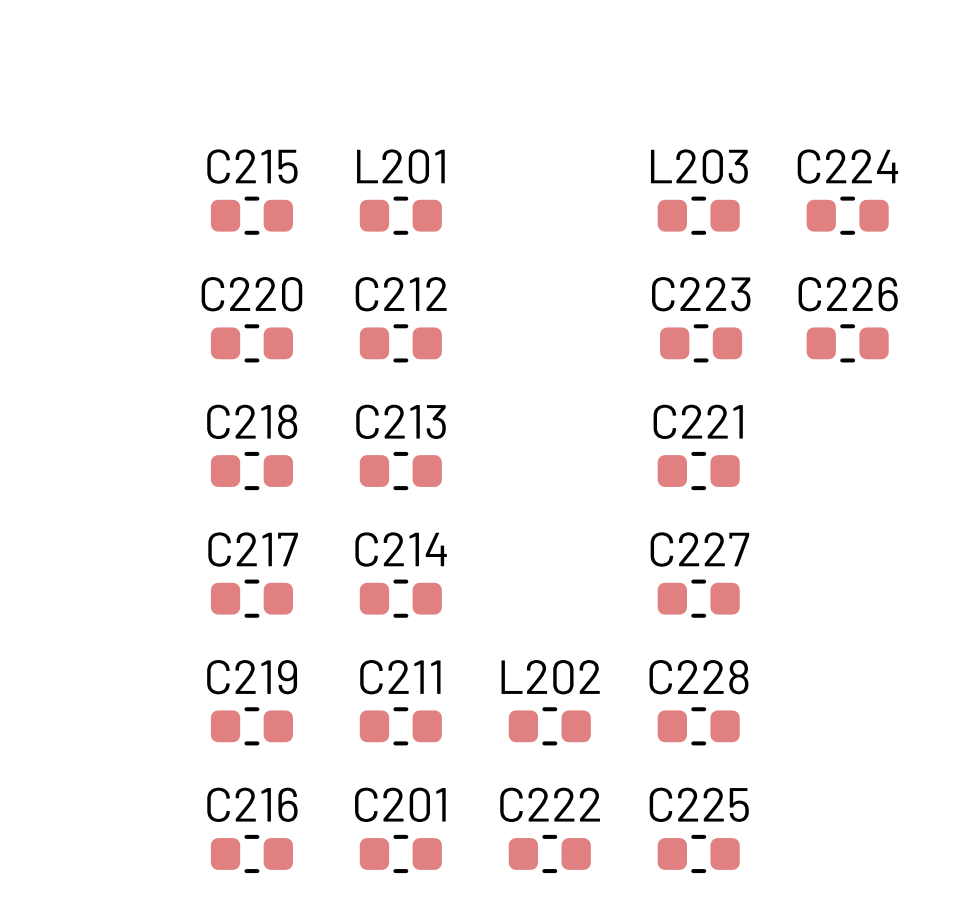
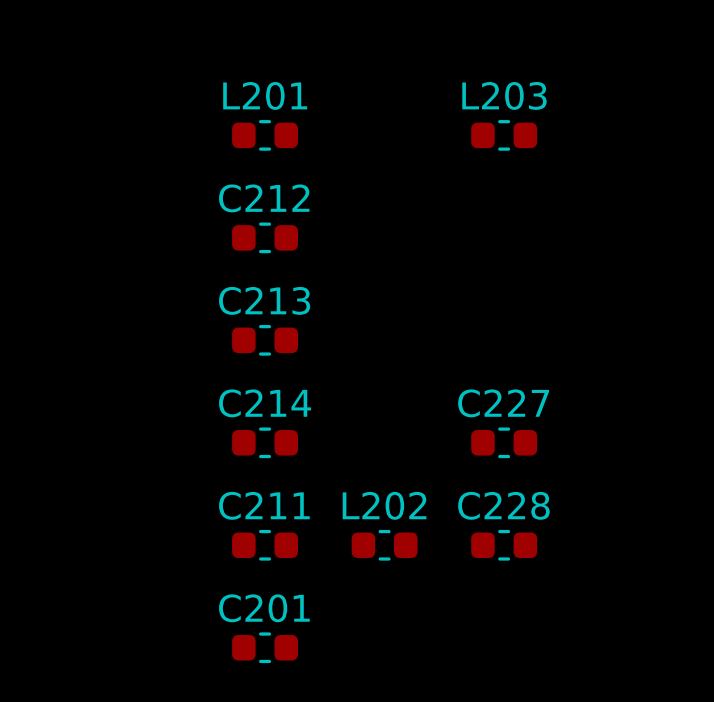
C215: (251, 215) -> none
C224: (847, 215) -> none
C220: (251, 343) -> none
C223: (701, 343) -> none
C226: (847, 343) -> none
C218: (251, 471) -> none
C221: (698, 471) -> none
C217: (251, 598) -> none
C219: (251, 726) -> none
C216: (251, 853) -> none
C222: (549, 853) -> none
C225: (698, 853) -> none

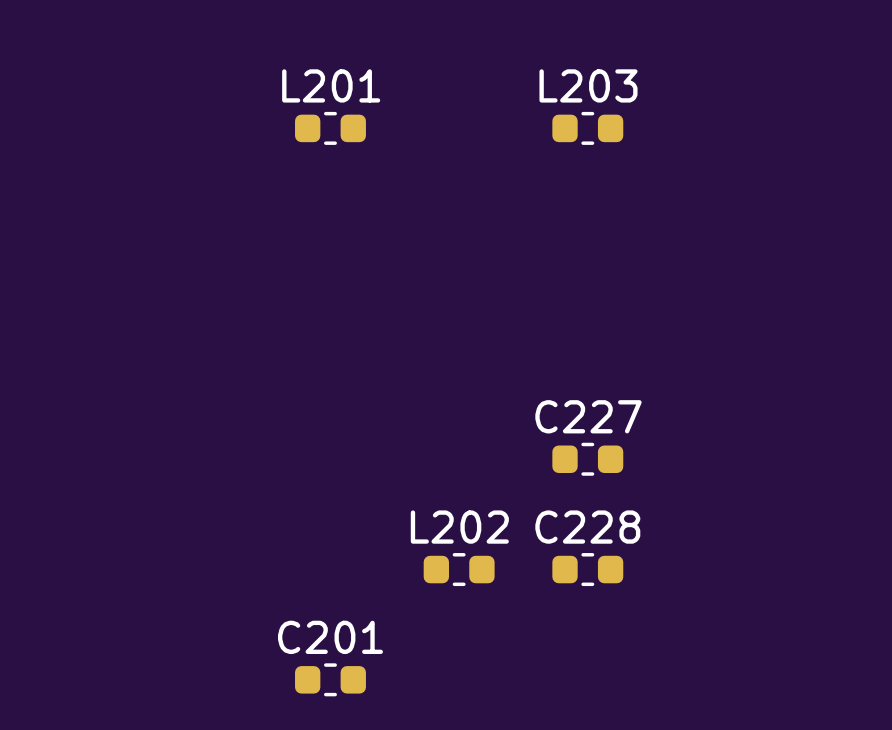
C212: (265, 237) -> none
C213: (265, 340) -> none
C214: (265, 442) -> none
C211: (265, 545) -> none

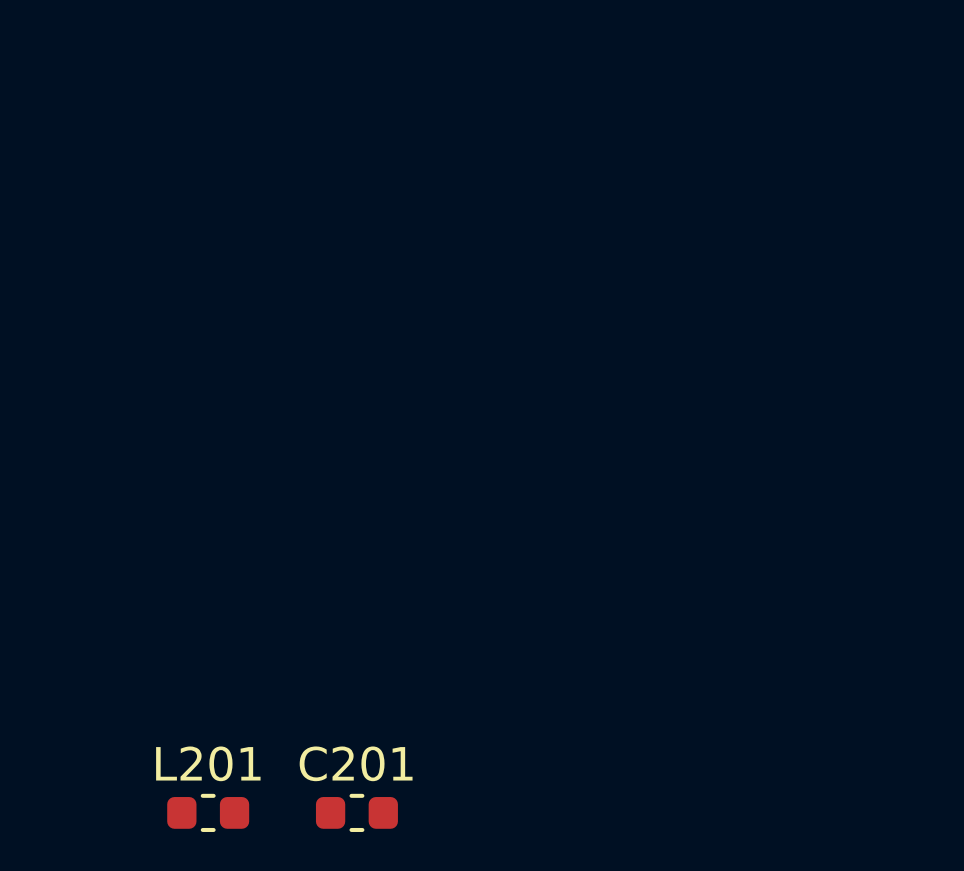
L201 position: (330, 128) -> (208, 812)
L203: (587, 128) -> none
C227: (587, 459) -> none
L202: (459, 569) -> none
C228: (587, 569) -> none
C201 position: (330, 679) -> (356, 812)

